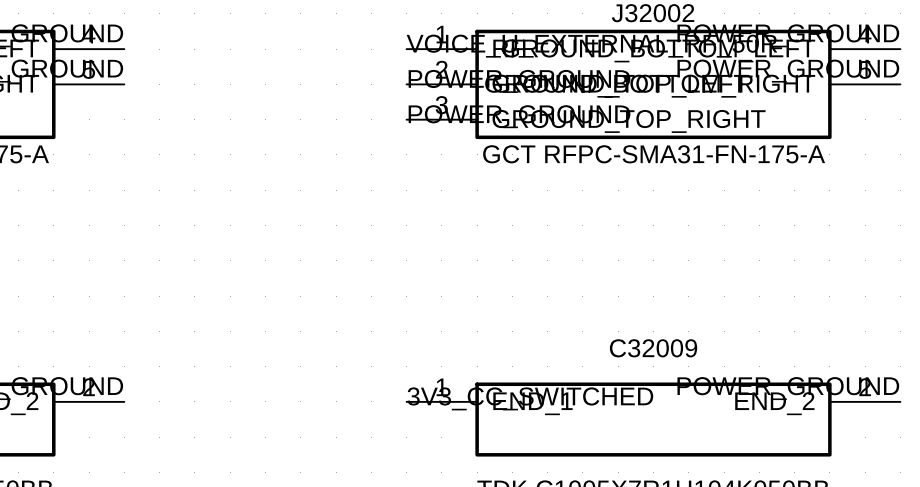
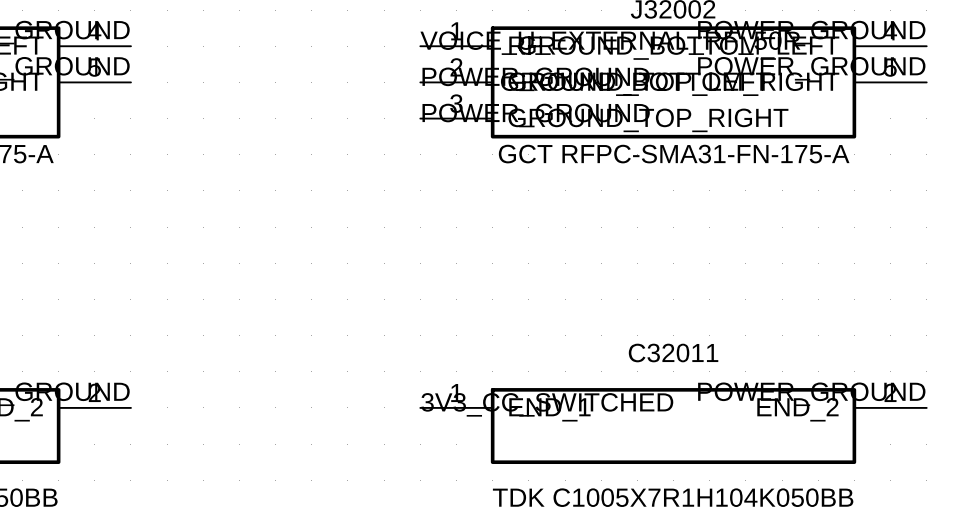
C32009 name: C32009 (653, 348) -> C32011 (673, 353)

